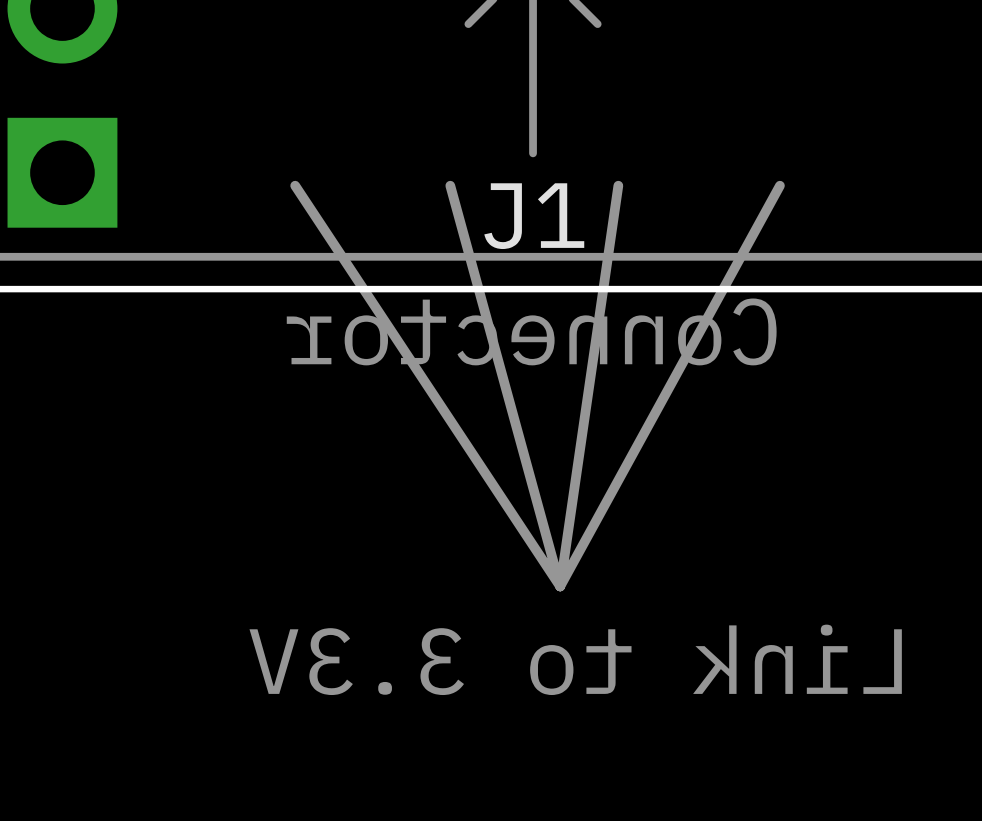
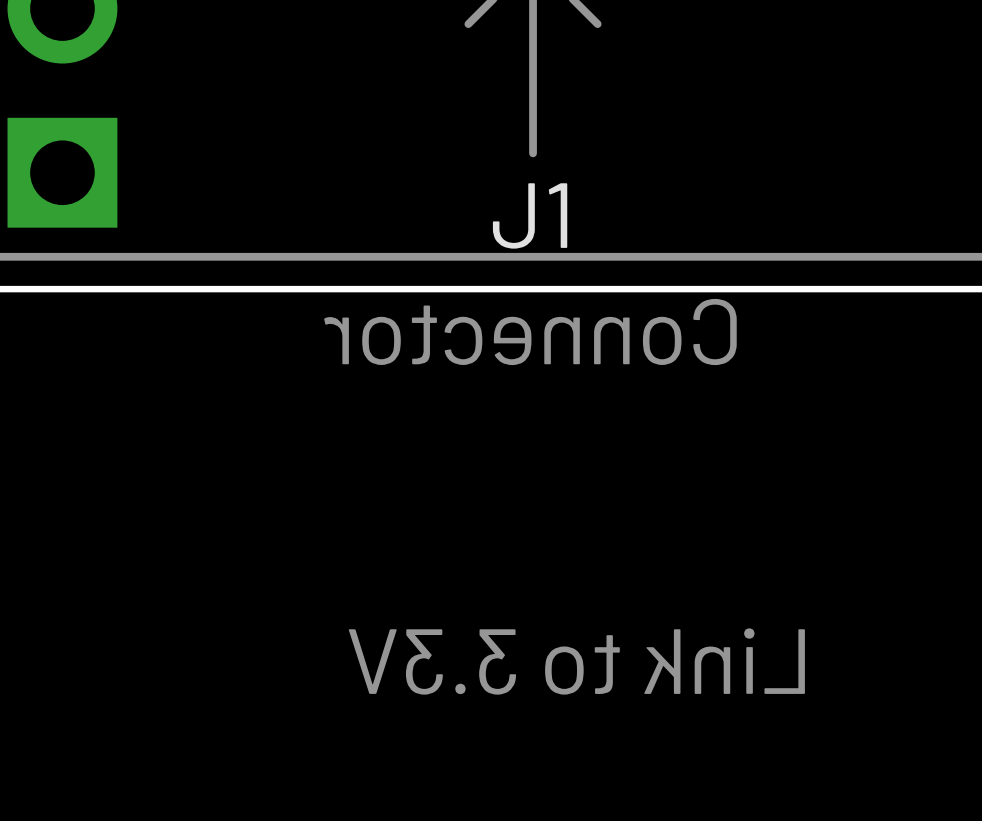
line: (295, 185) (560, 586) -> none
line: (450, 185) (560, 586) -> none
line: (618, 185) (560, 586) -> none
line: (779, 185) (560, 586) -> none

